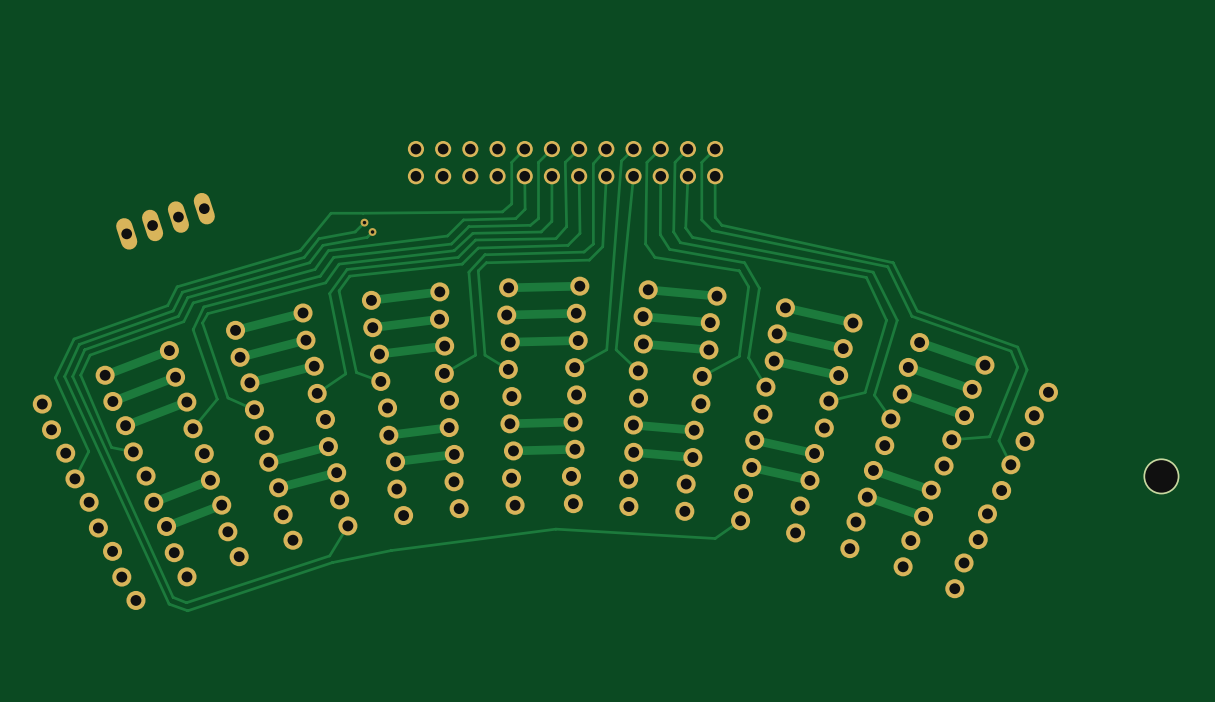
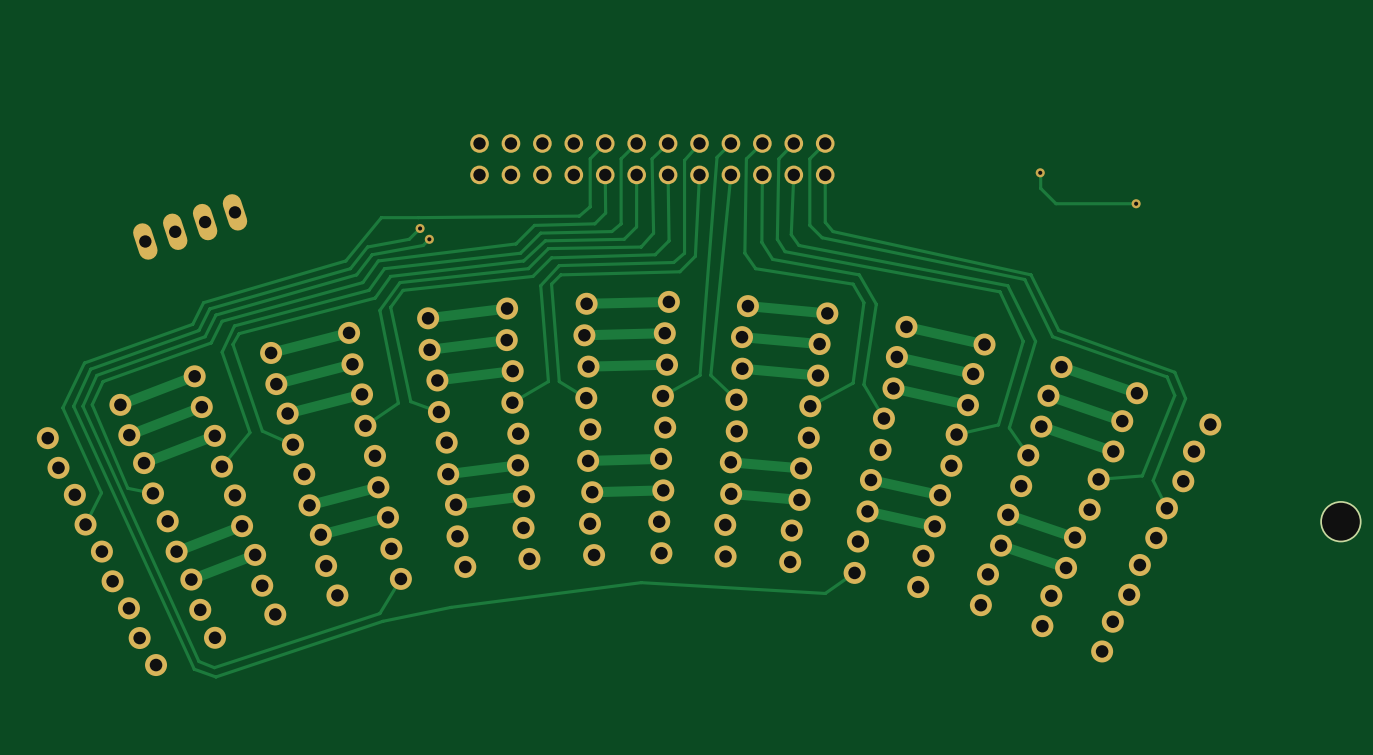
track: none -> (1040, 172) (1040, 188) (1056, 203) (1136, 203)
via: none -> (1040, 172)
via: none -> (1136, 203)

